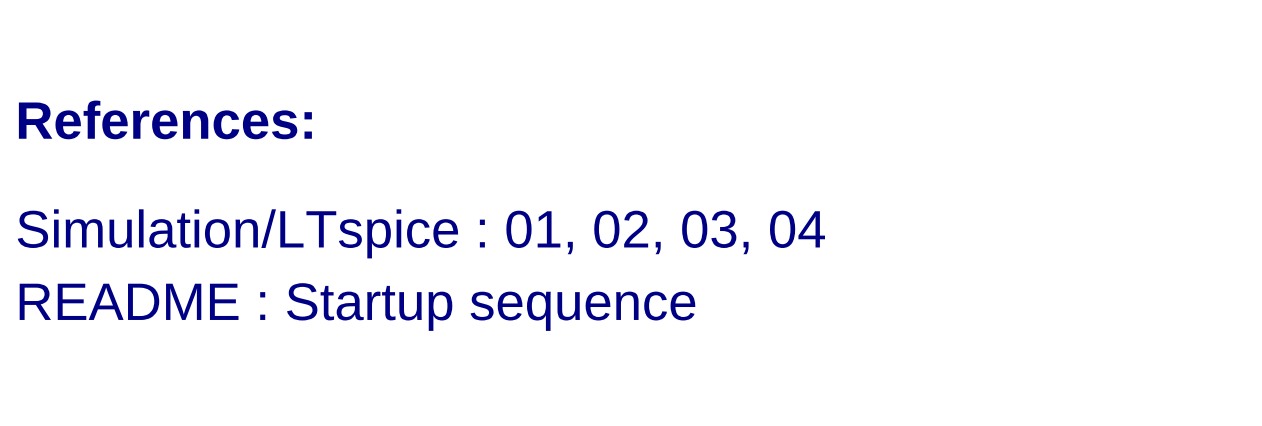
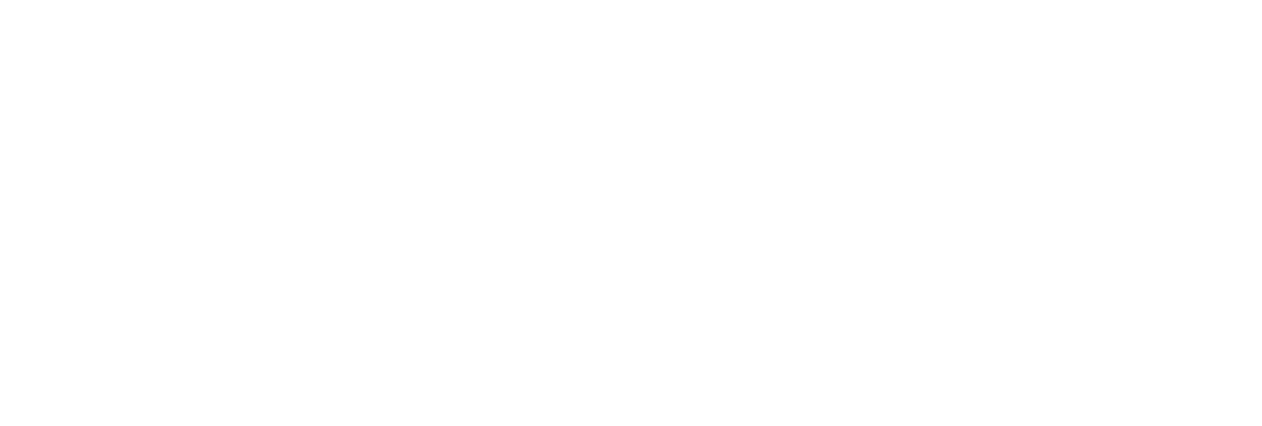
text: References: (165, 119) -> none
text: Simulation/LTspice : 01, 02, 03, 04 (421, 233) -> none
text: README : Startup sequence (357, 307) -> none

